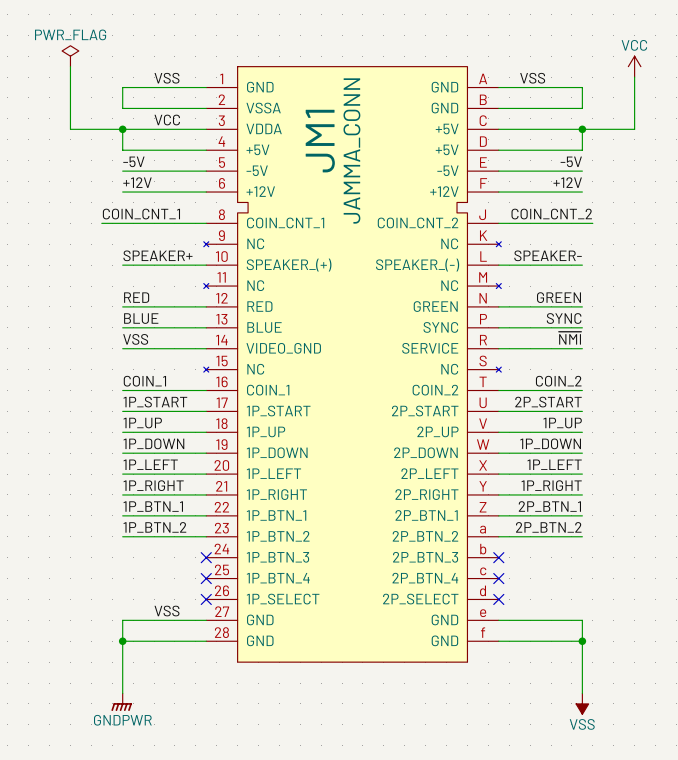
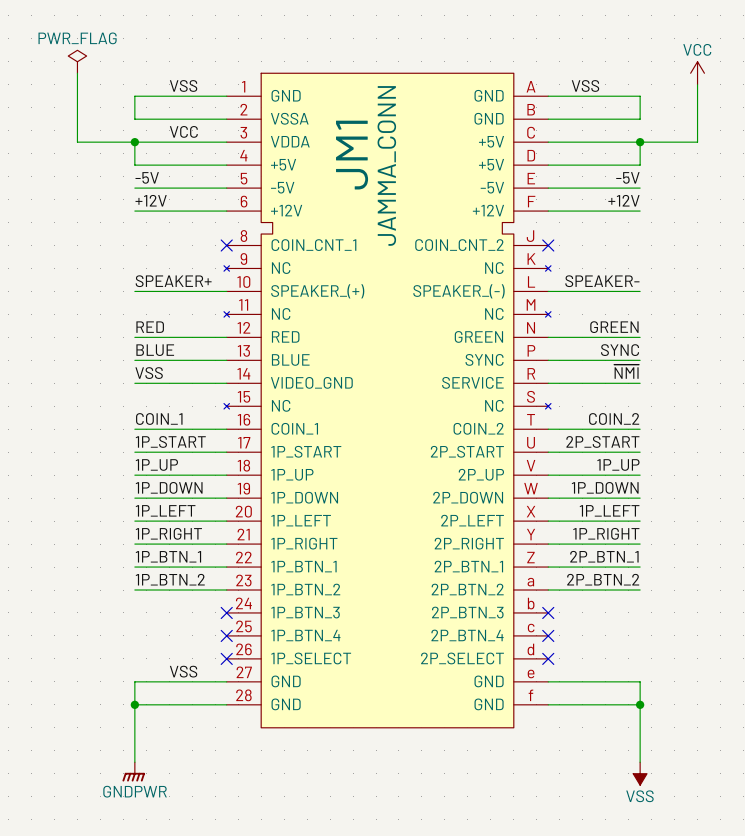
label: COIN_CNT_1 (141, 214) -> none
label: COIN_CNT_2 (551, 214) -> none
wire: (101, 223) (206, 223) -> none
no-connect mark: none -> (226, 245)
wire: (498, 223) (592, 223) -> none
no-connect mark: none -> (548, 245)

